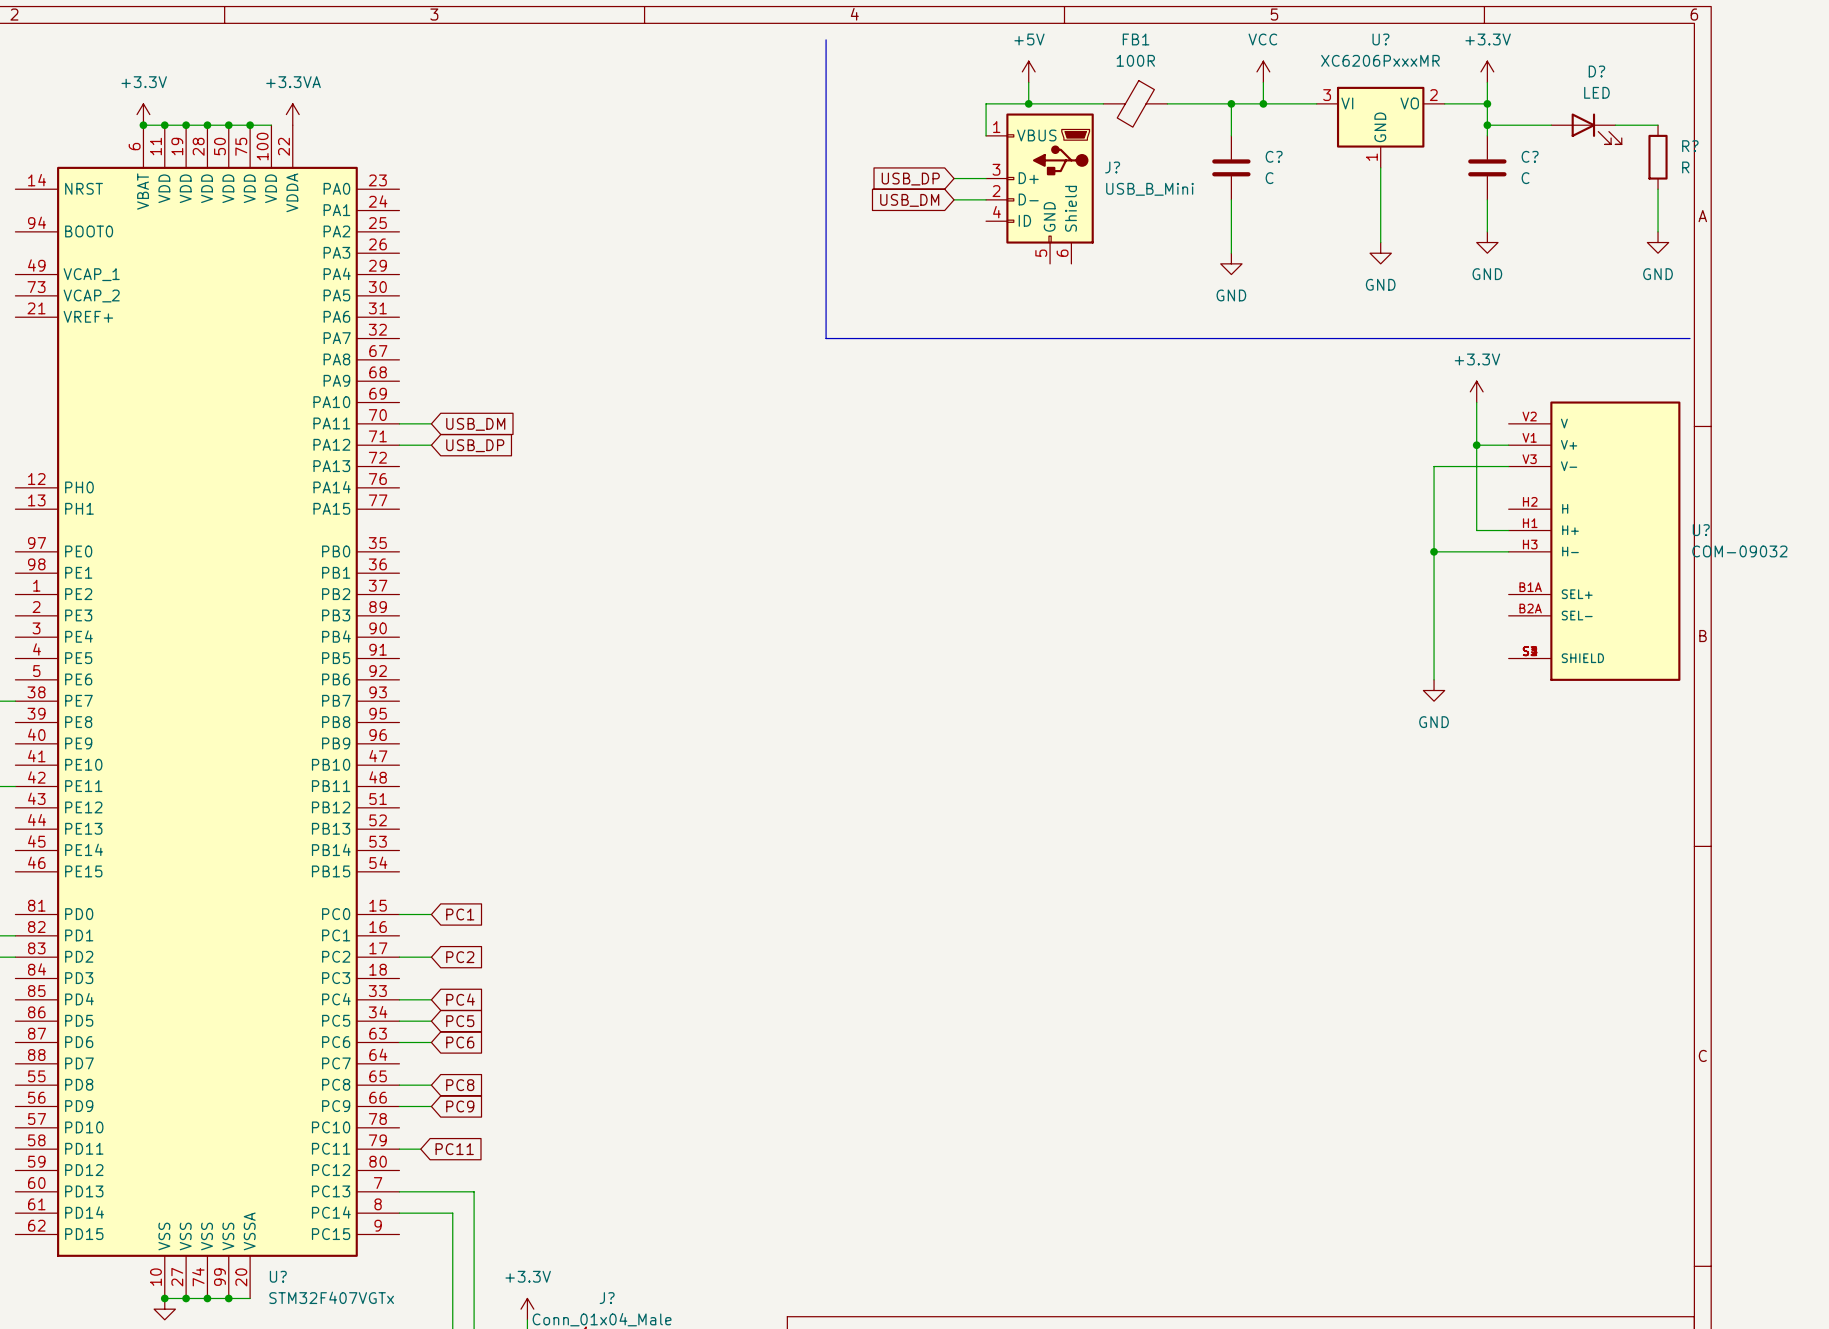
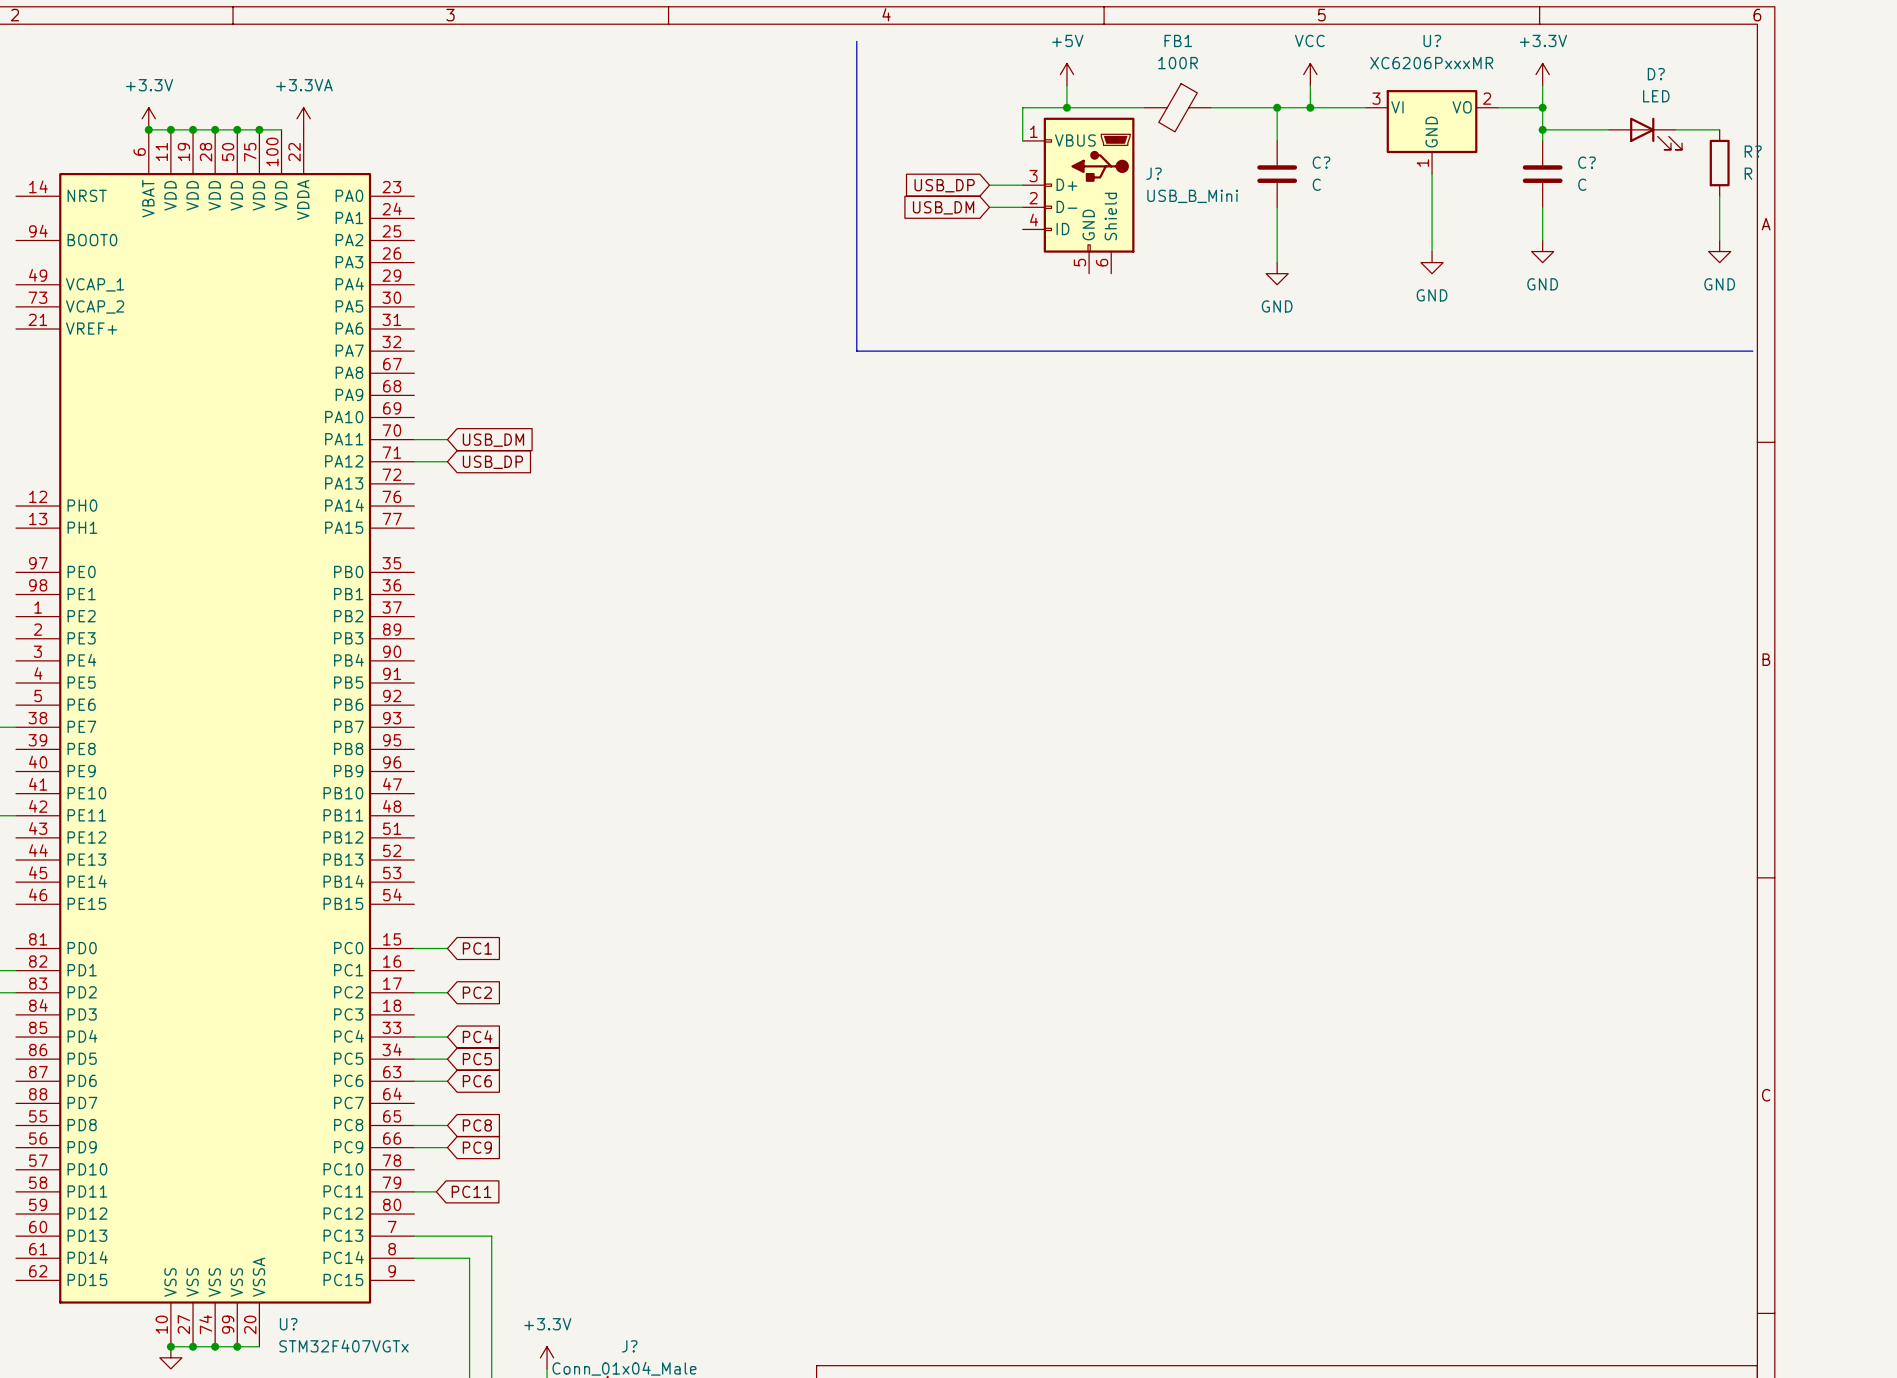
power symbol: +3.3V (1476, 391) -> none
wire: (1476, 402) (1476, 530) (1508, 530) -> none
wire: (1476, 445) (1508, 445) -> none
junction: (1476, 445) -> none
wire: (1508, 466) (1434, 466) (1434, 679) -> none
U?: COM-09032 (1594, 541) -> none
wire: (1434, 551) (1508, 551) -> none
junction: (1434, 551) -> none
power symbol: GND (1434, 690) -> none

